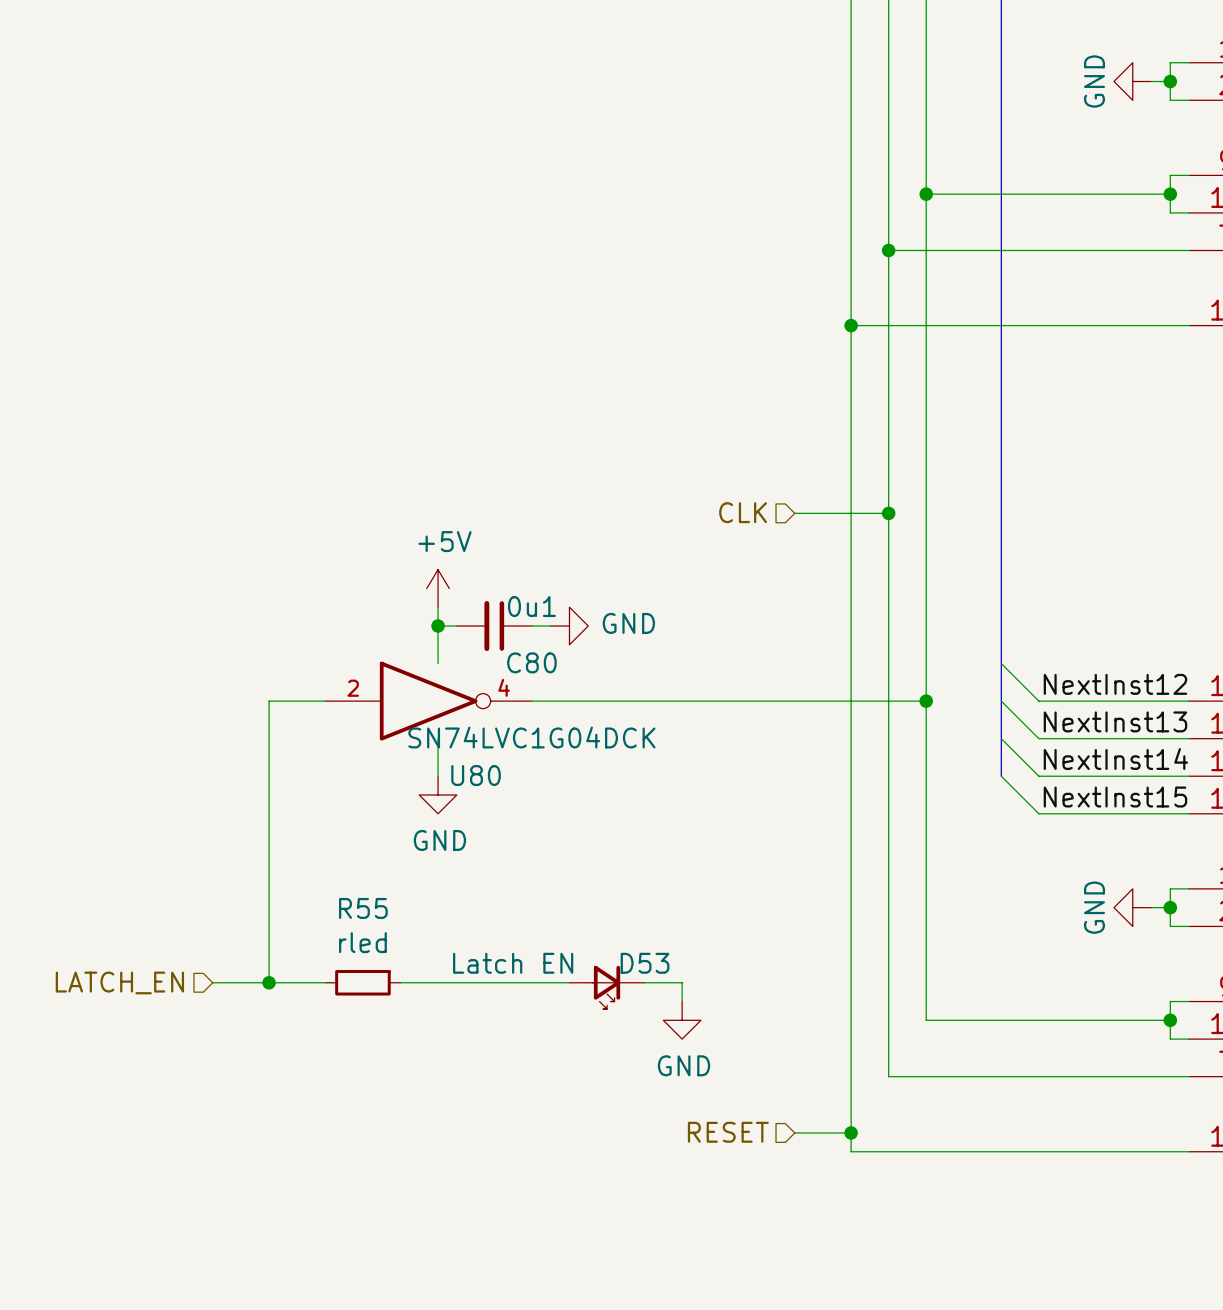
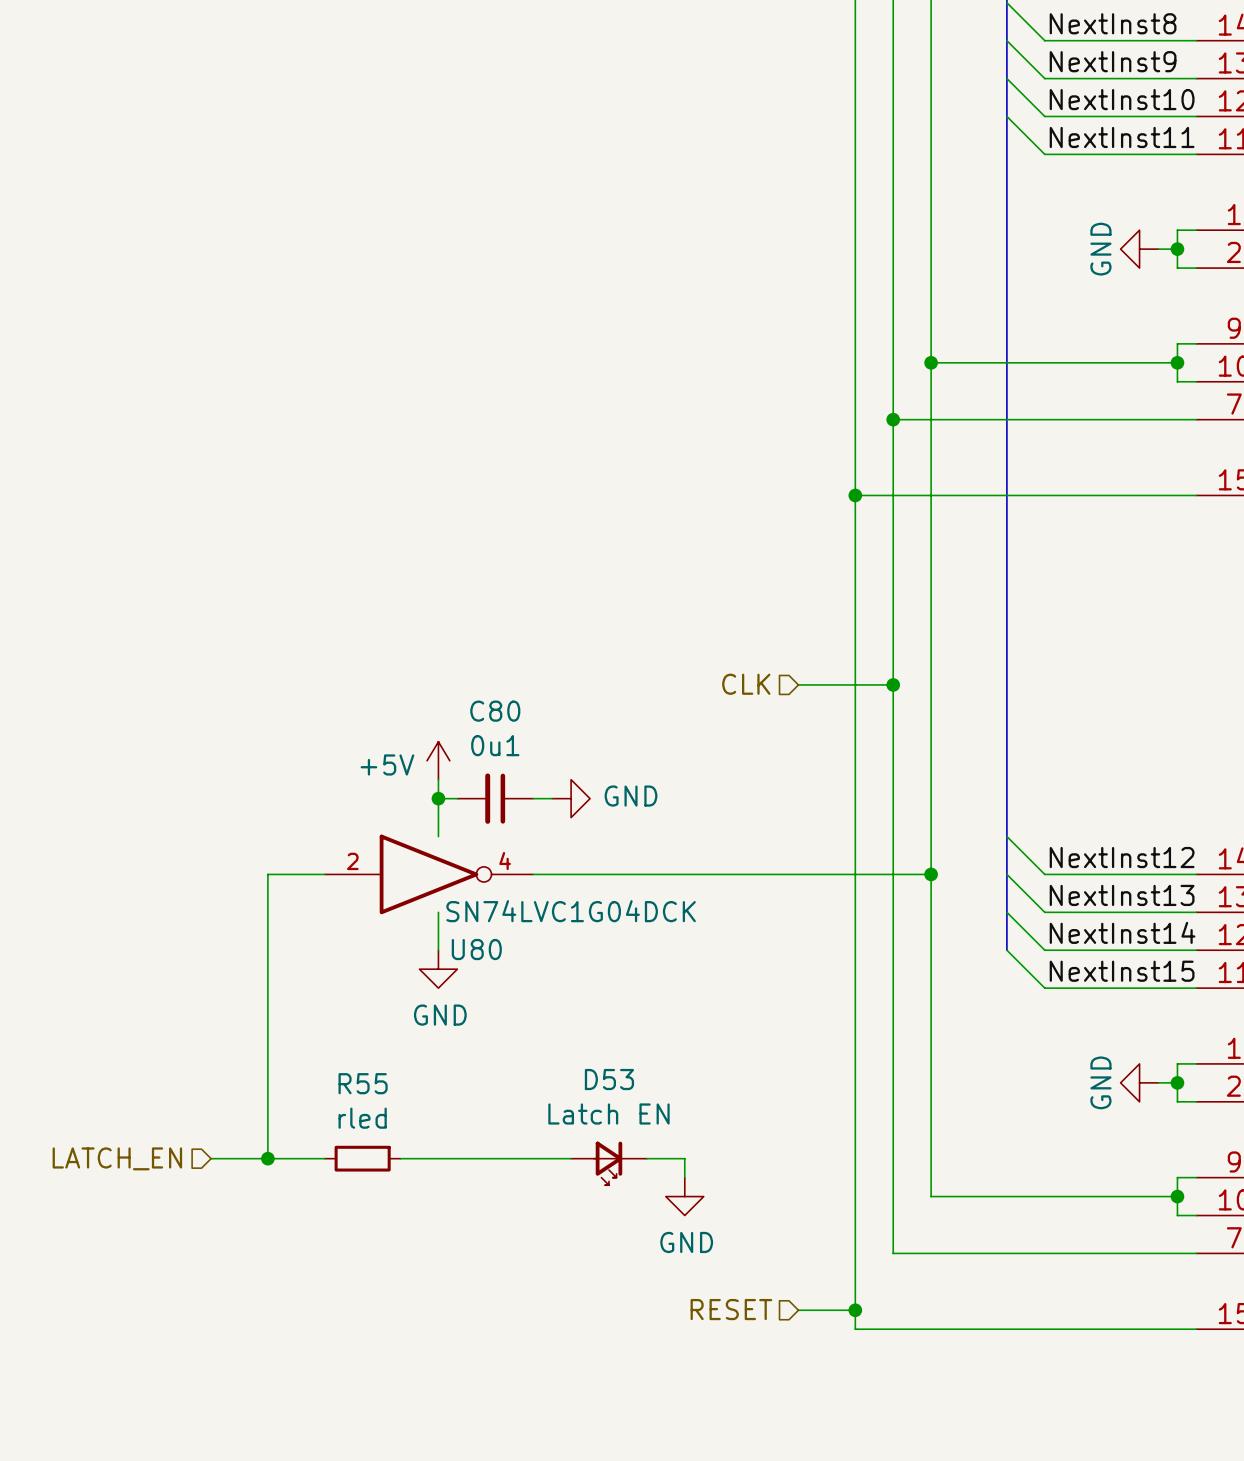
power symbol text position: +5V (445, 541) -> +5V (387, 764)
C80 value position: 0u1 (531, 606) -> 0u1 (495, 745)
C80 name position: C80 (531, 662) -> C80 (495, 711)
U80 value position: SN74LVC1G04DCK (531, 737) -> SN74LVC1G04DCK (571, 911)
D53 value position: Latch EN (513, 963) -> Latch EN (608, 1114)
D53 name position: D53 (645, 963) -> D53 (609, 1079)

